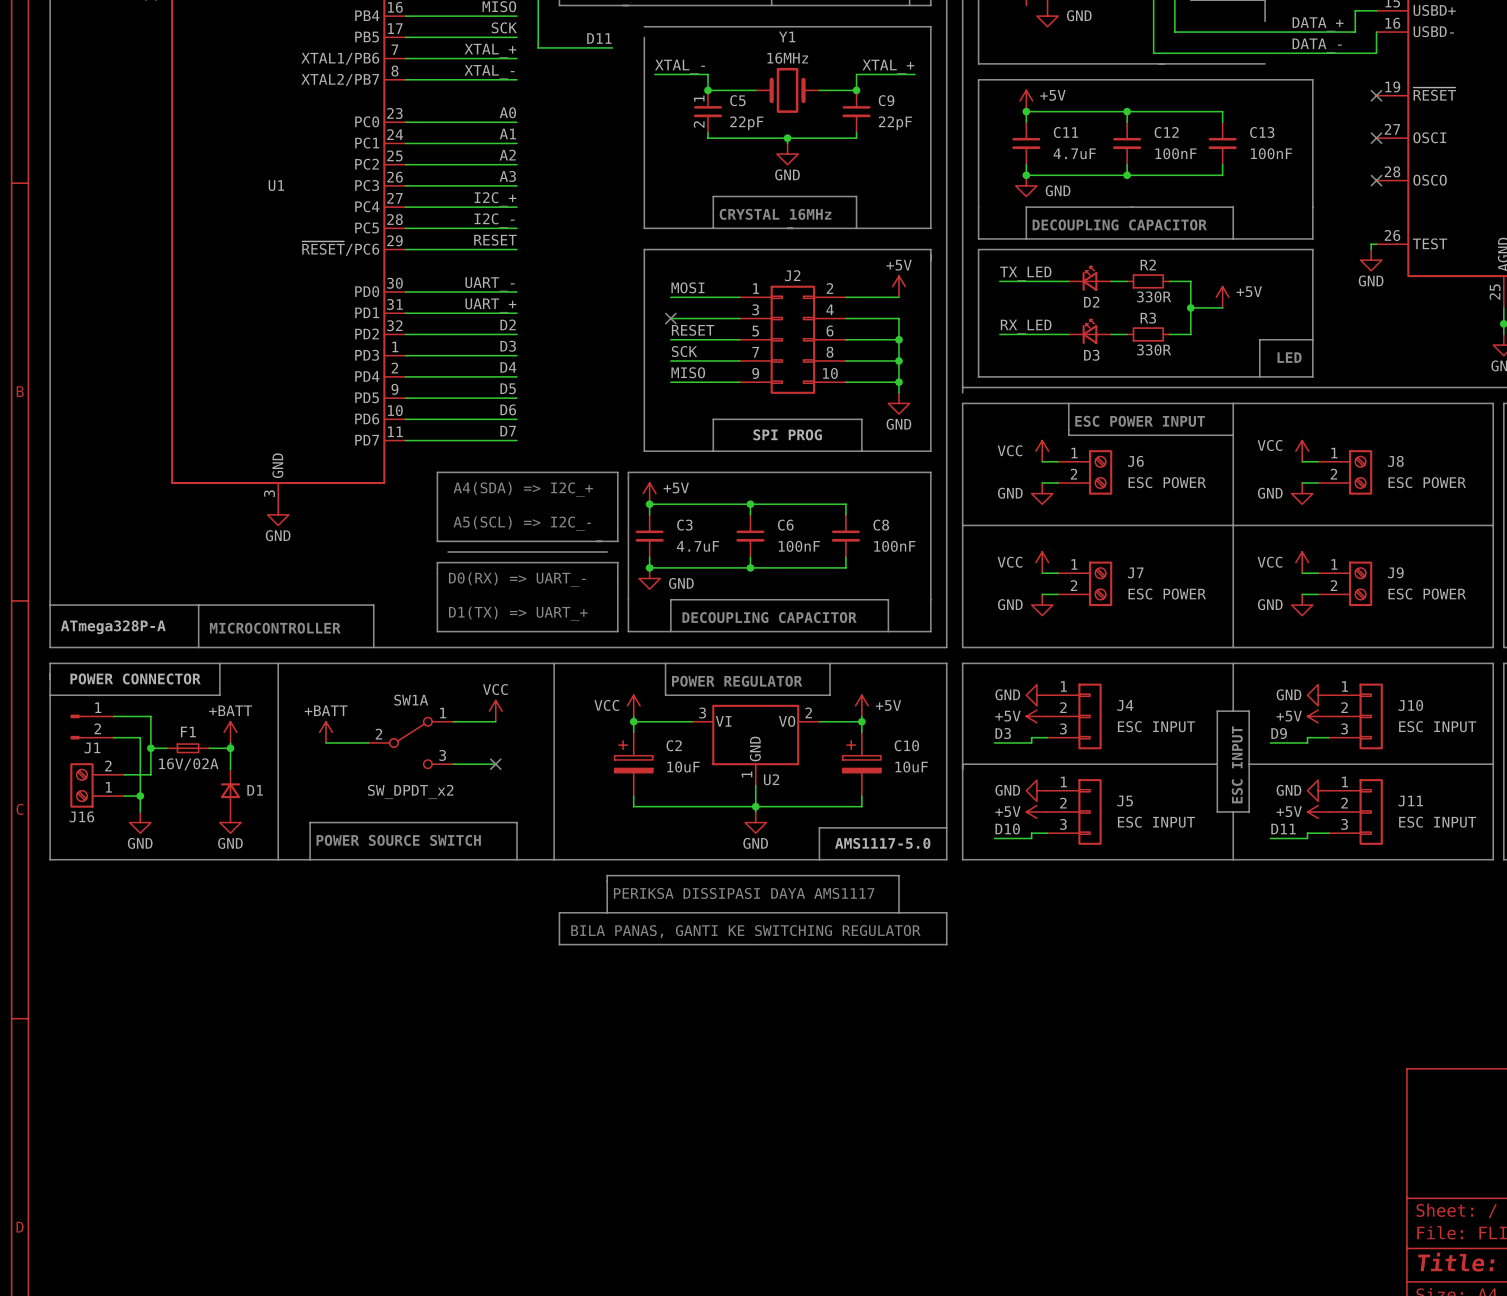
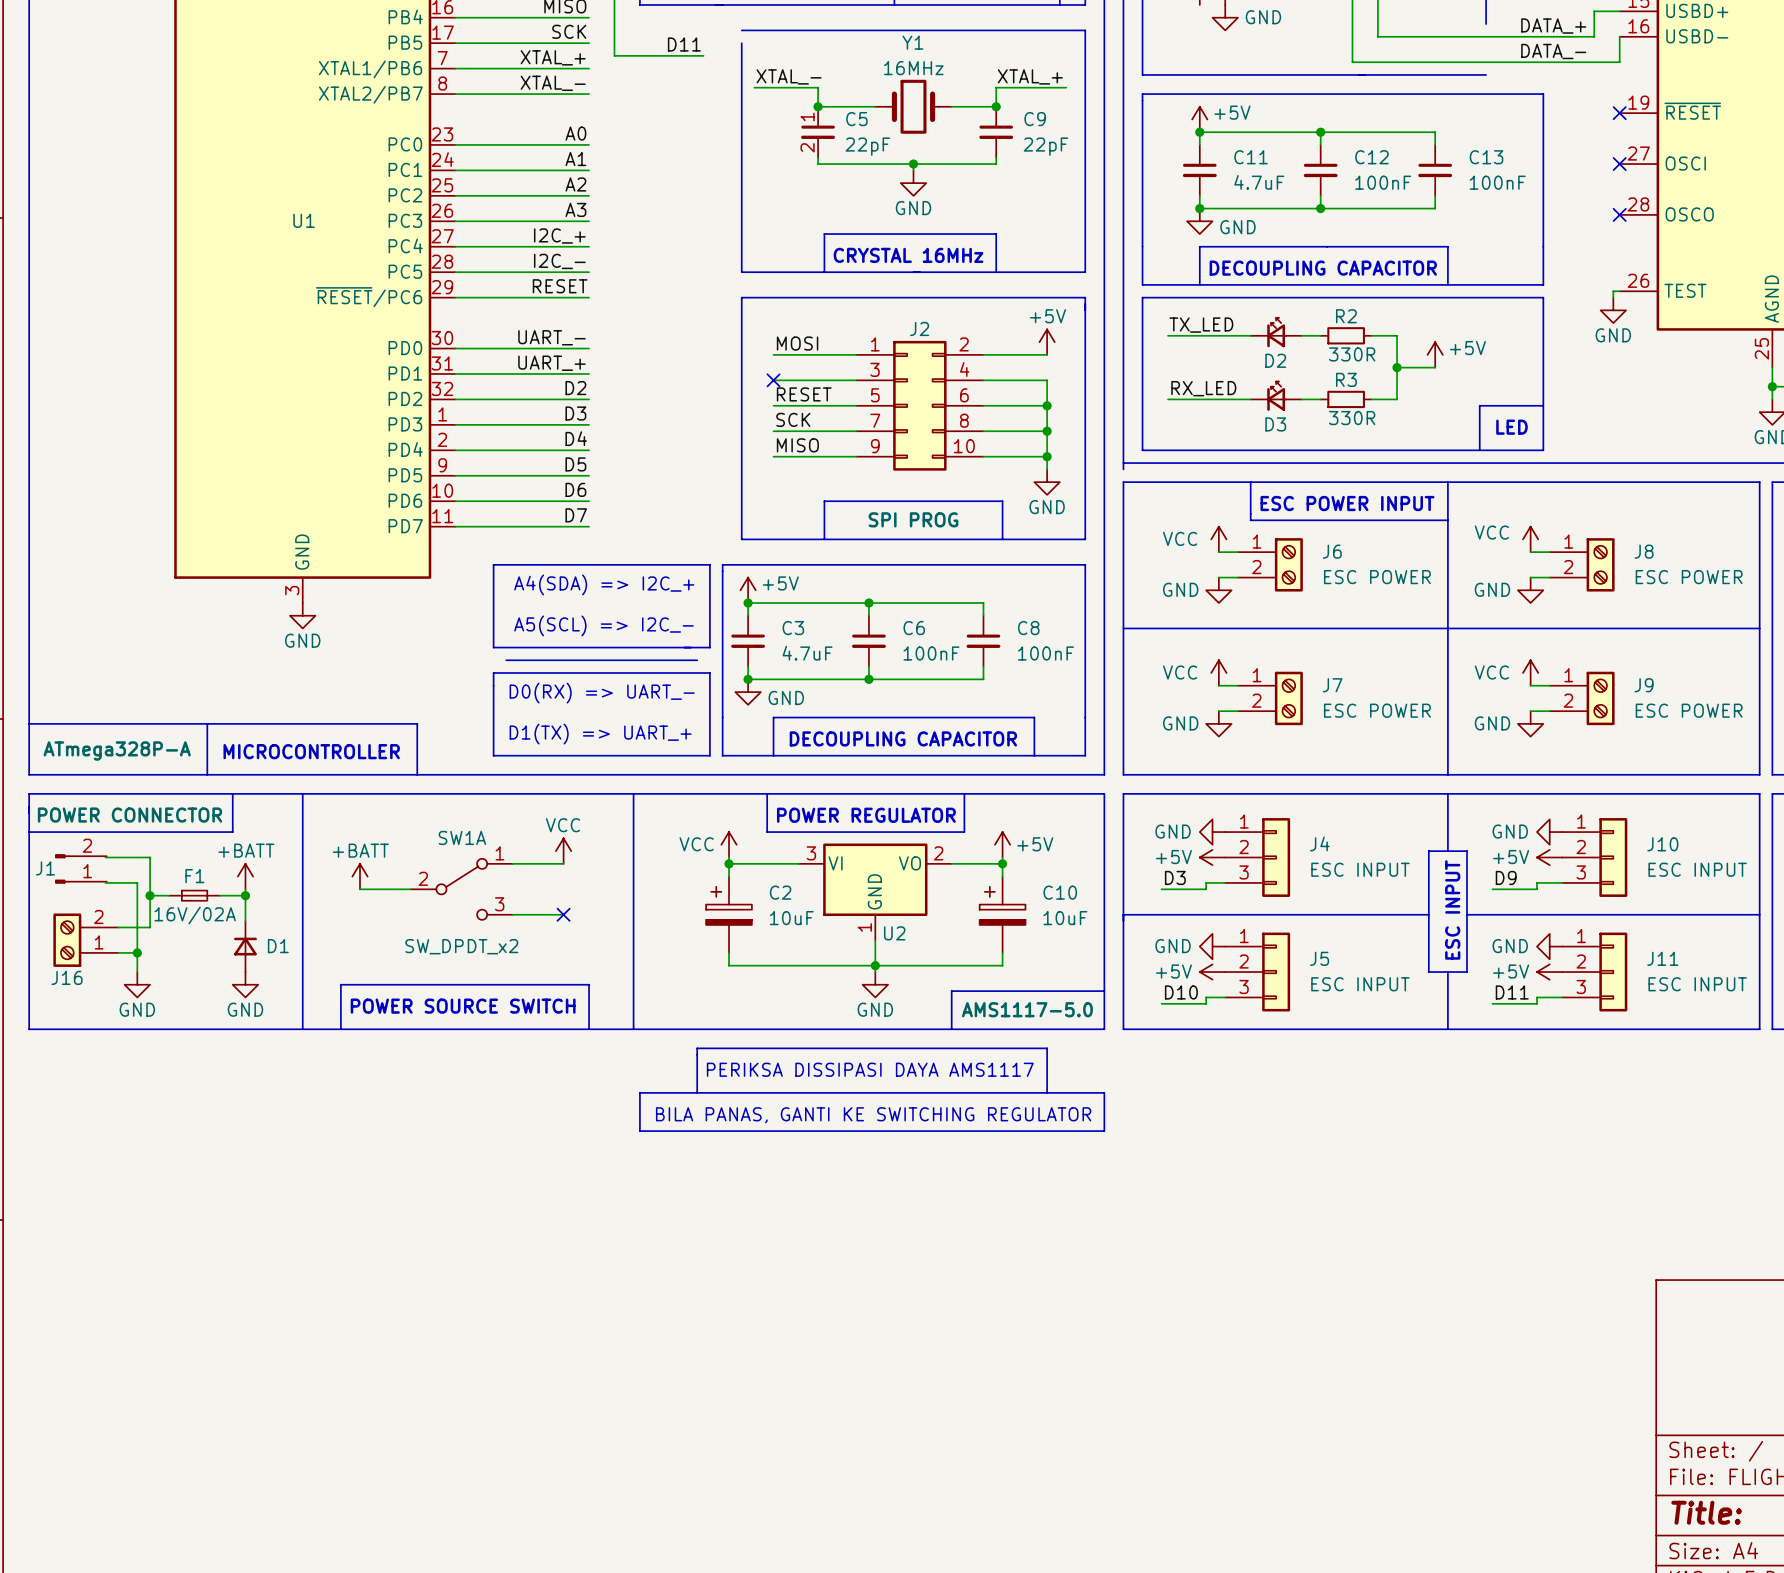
J1 flip: as is (76, 727) -> up-down (62, 868)
J1 name position: J1 (92, 748) -> J1 (45, 868)

